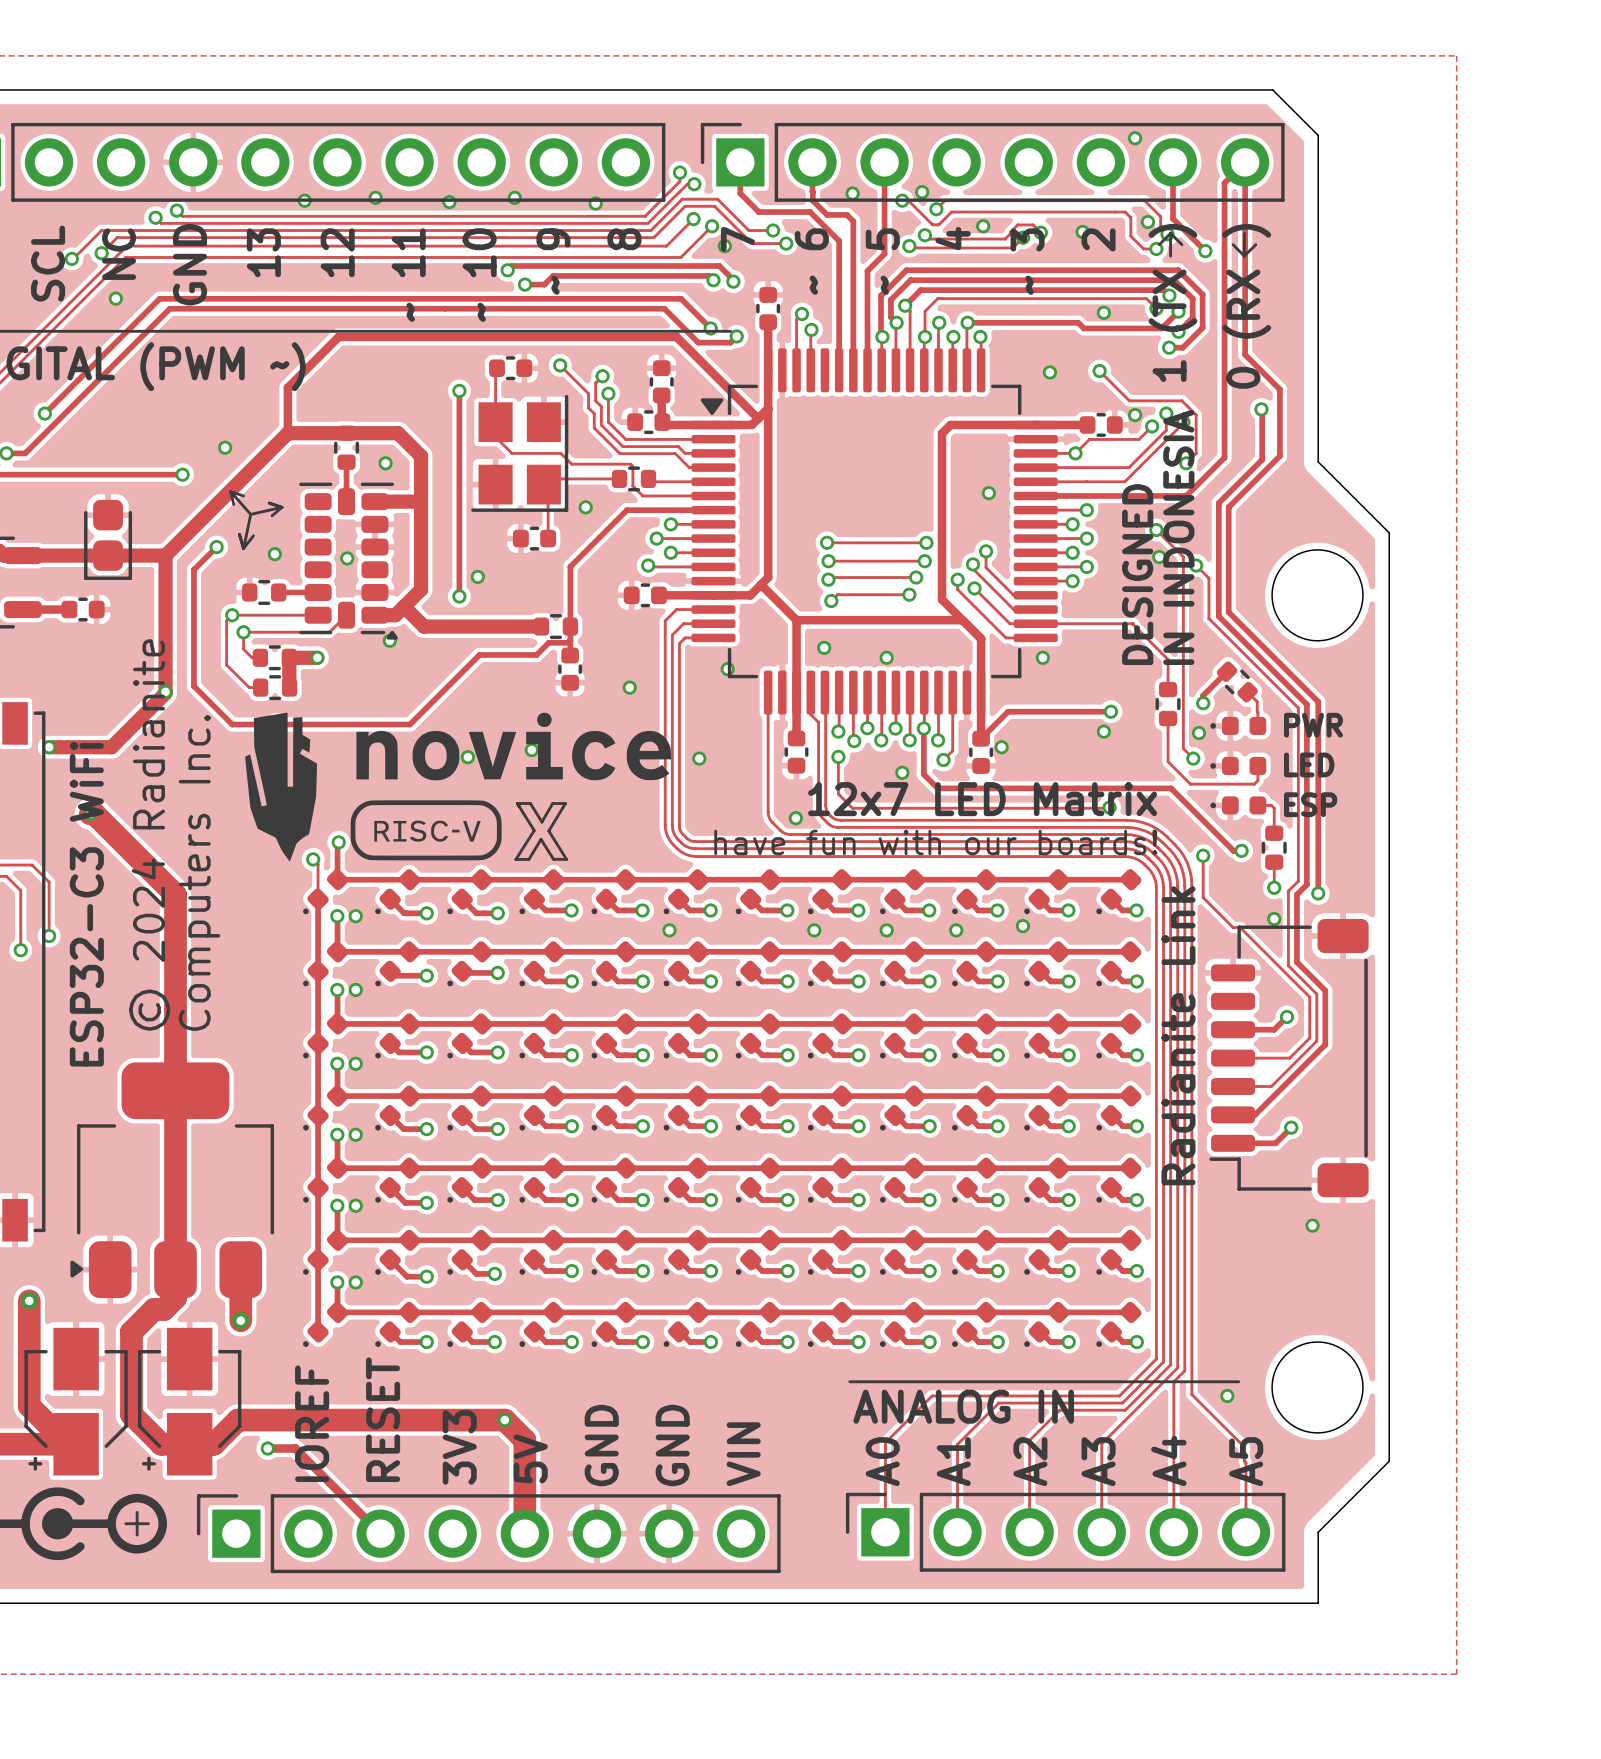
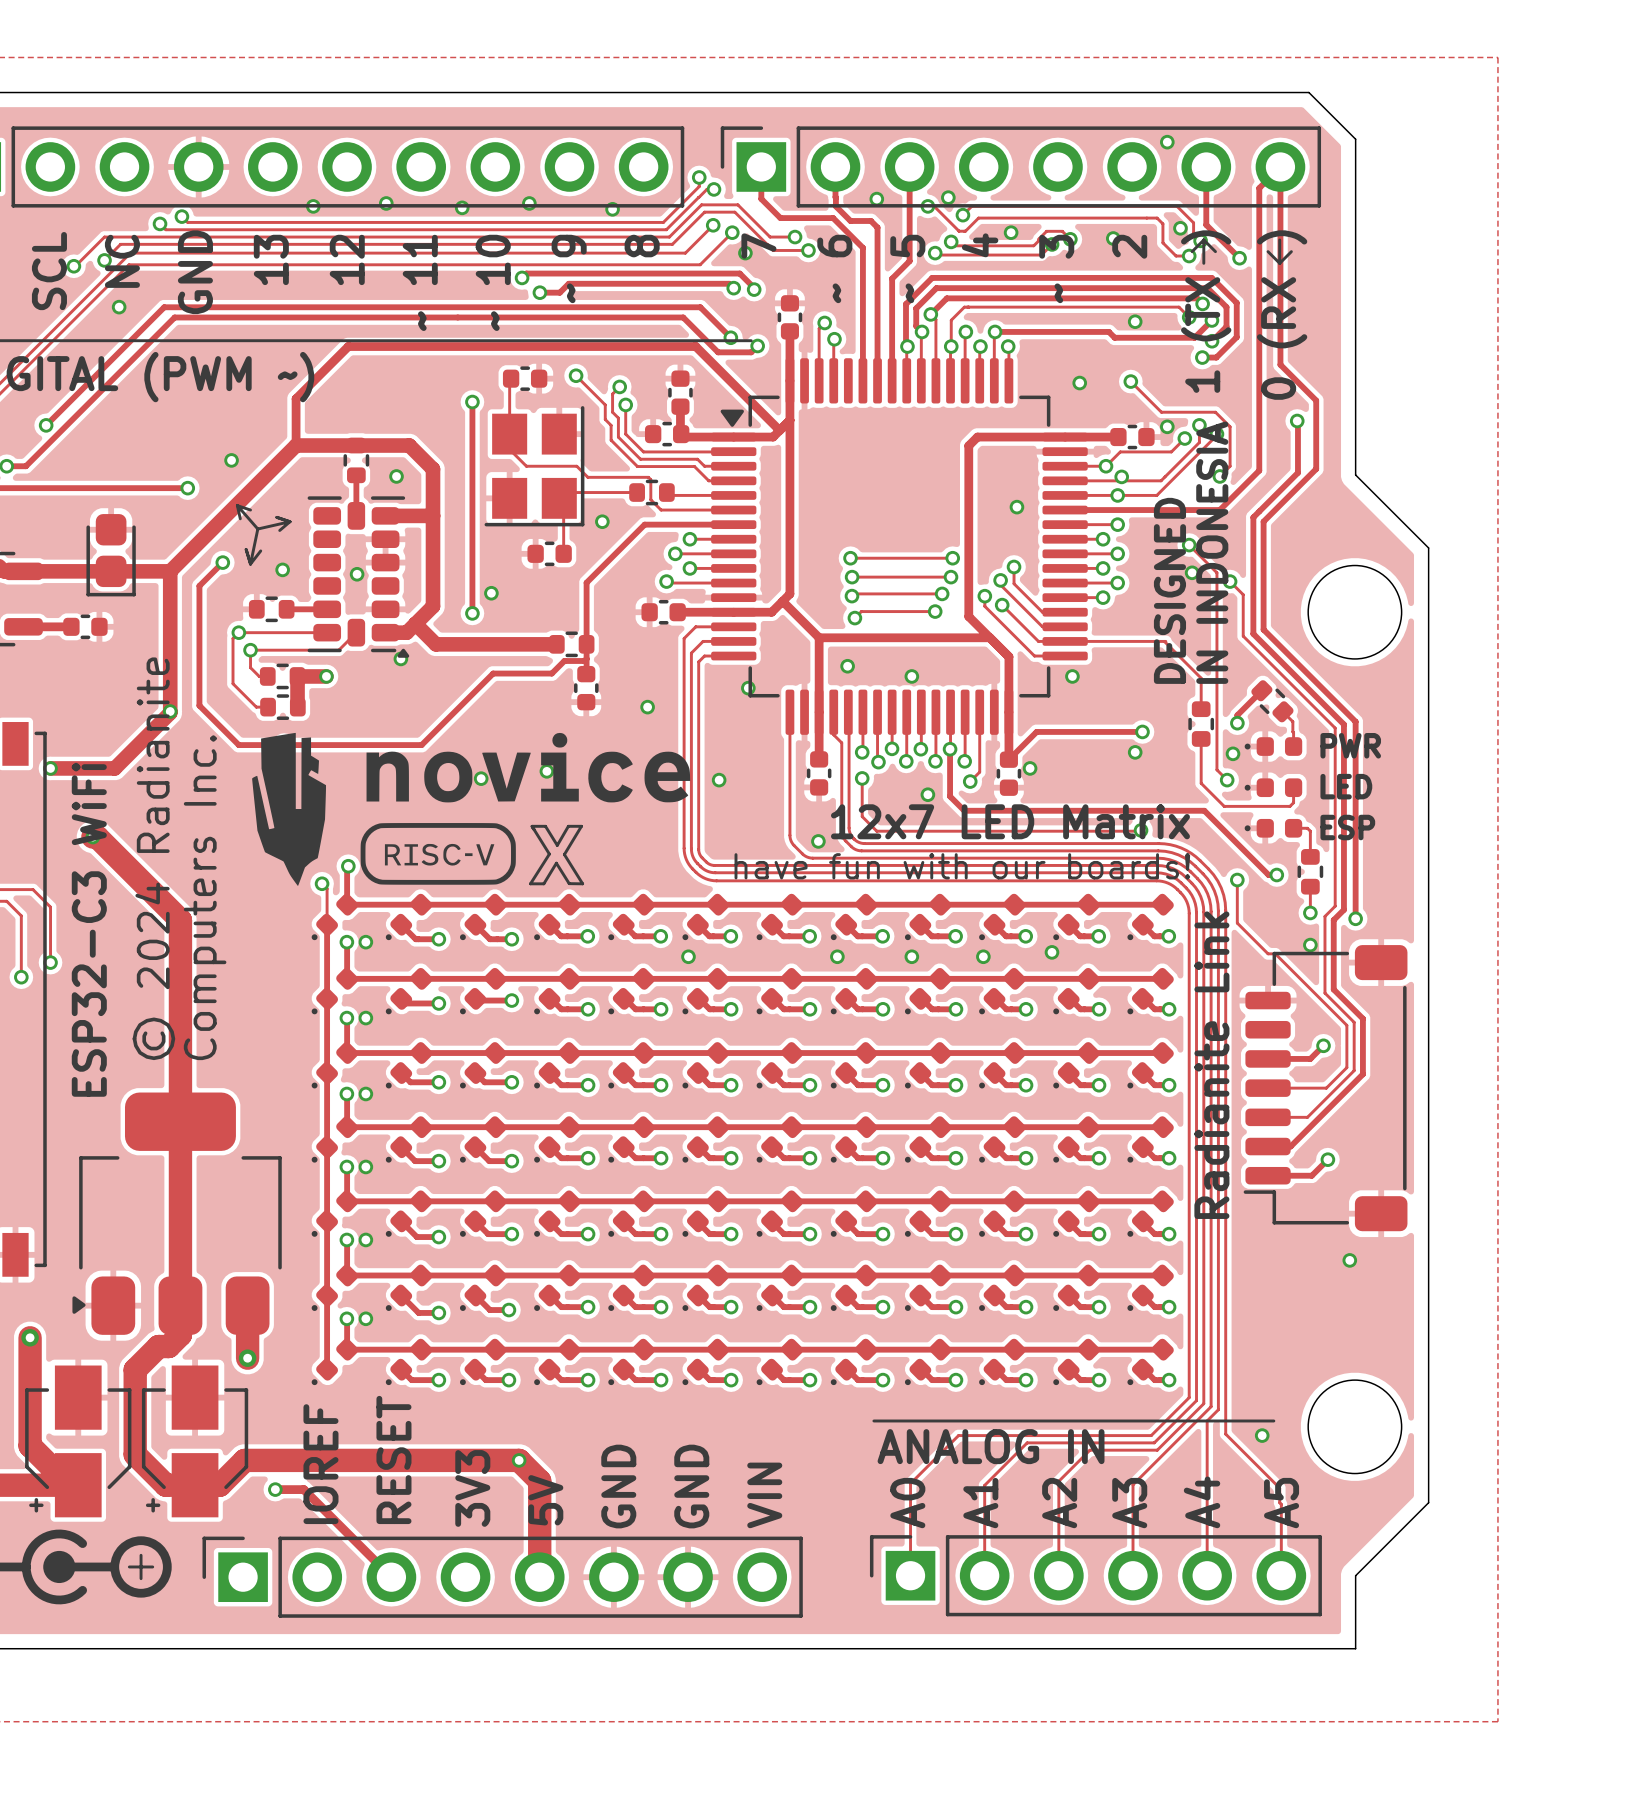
via: none -> (1121, 476)
via: none -> (1117, 495)

